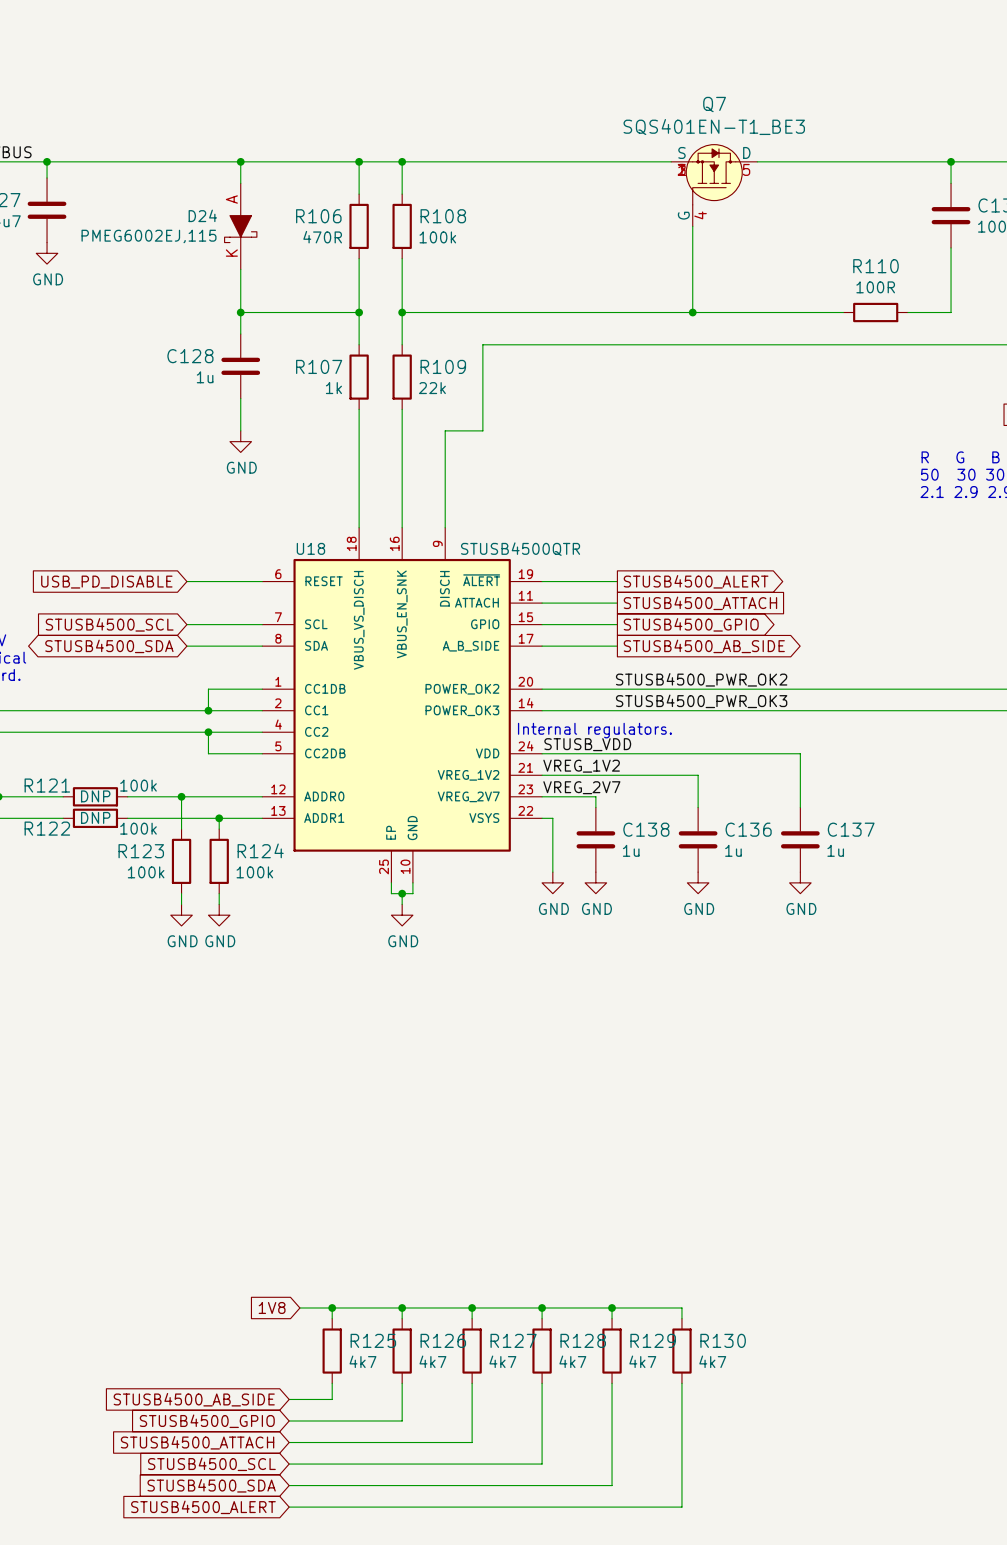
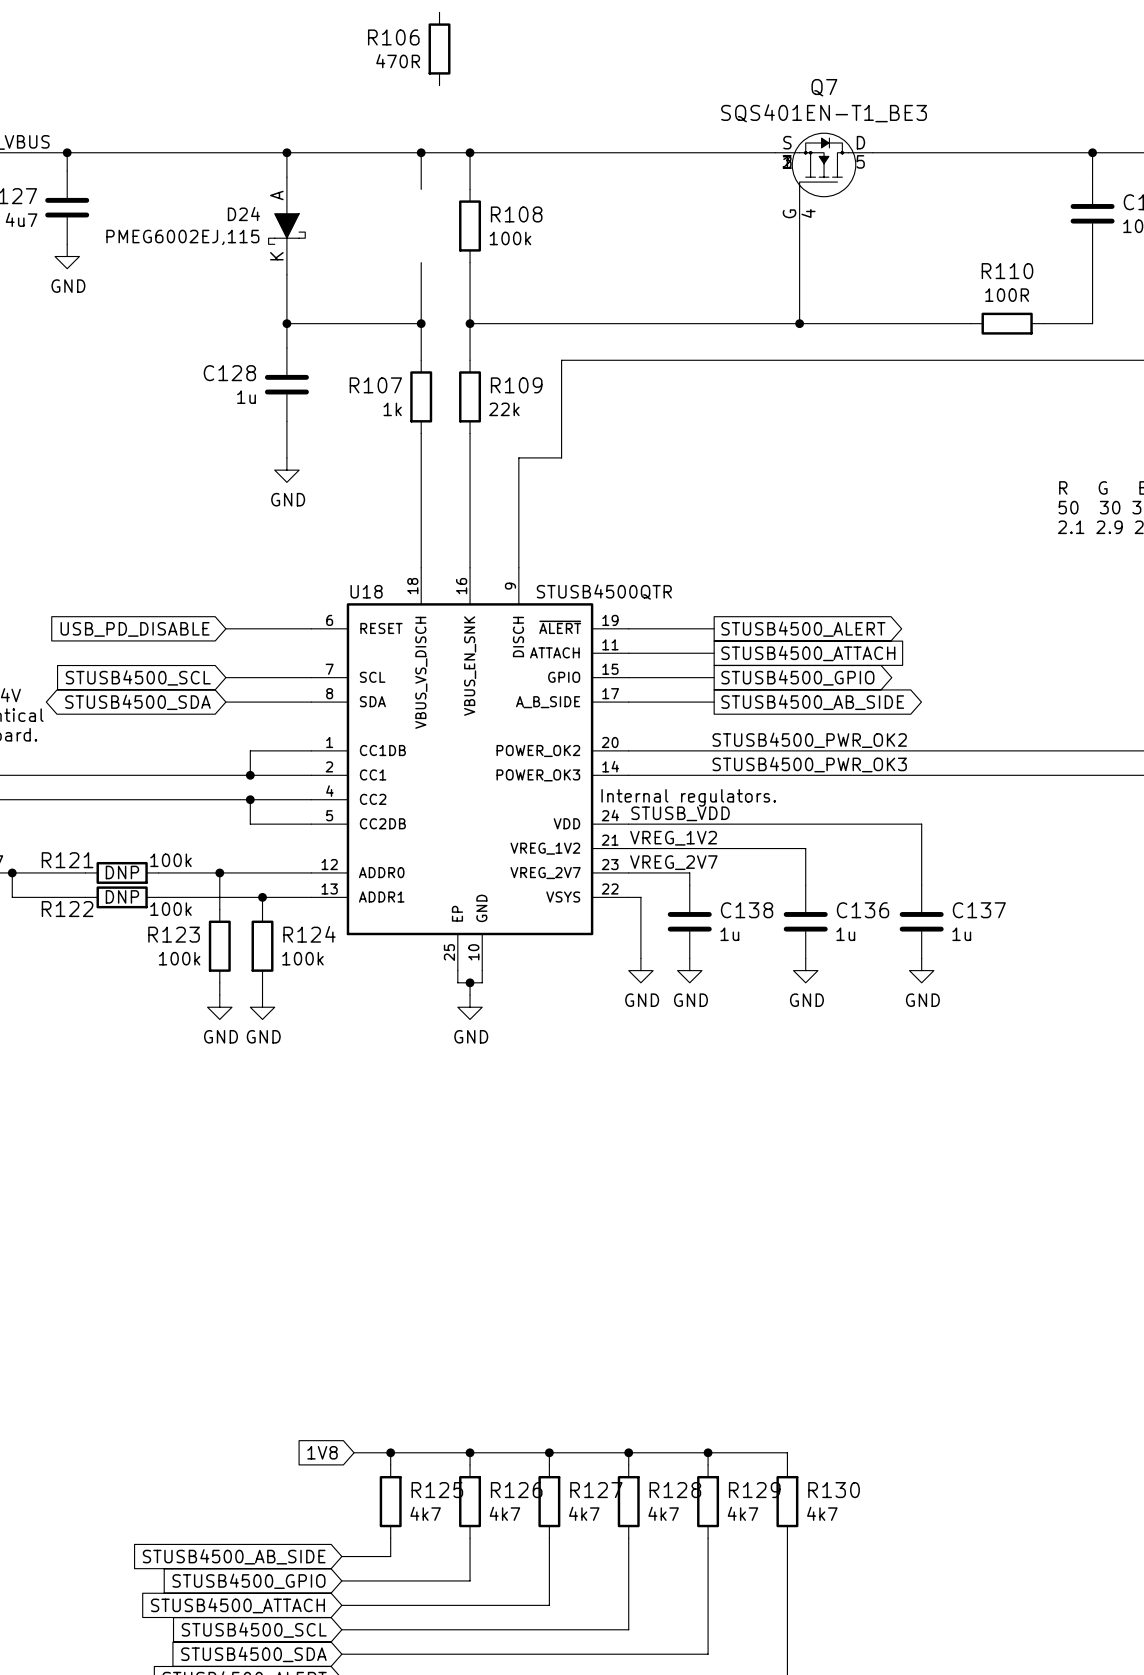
R106 position: (359, 226) -> (439, 49)

